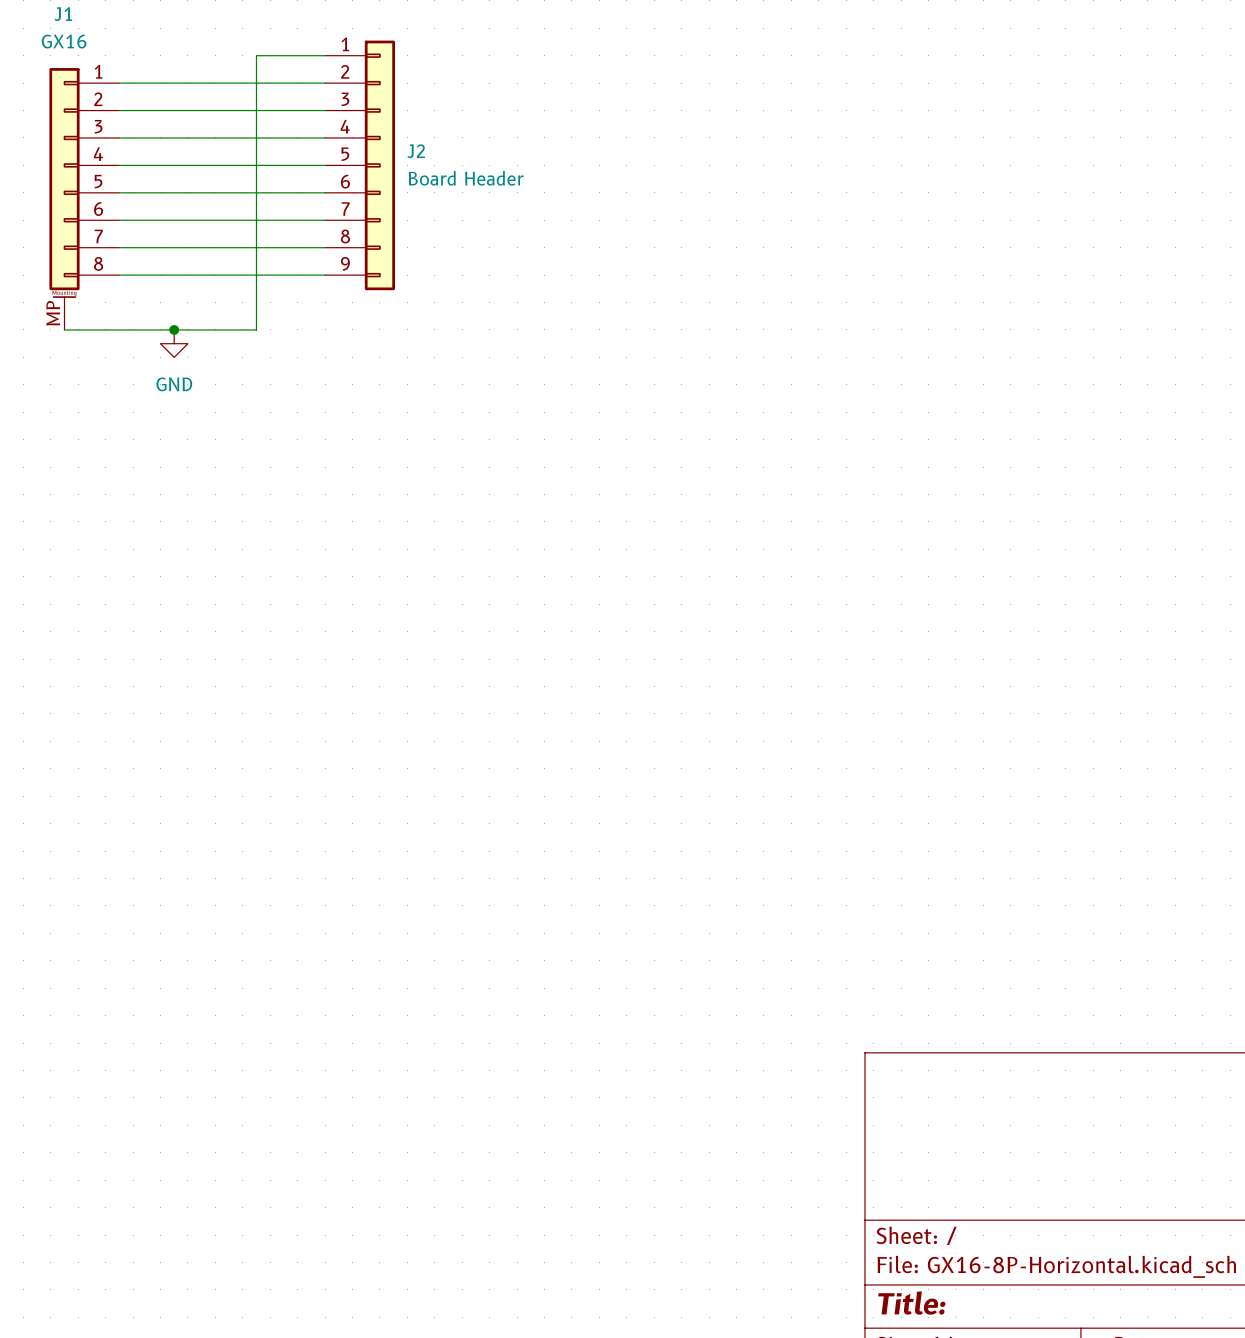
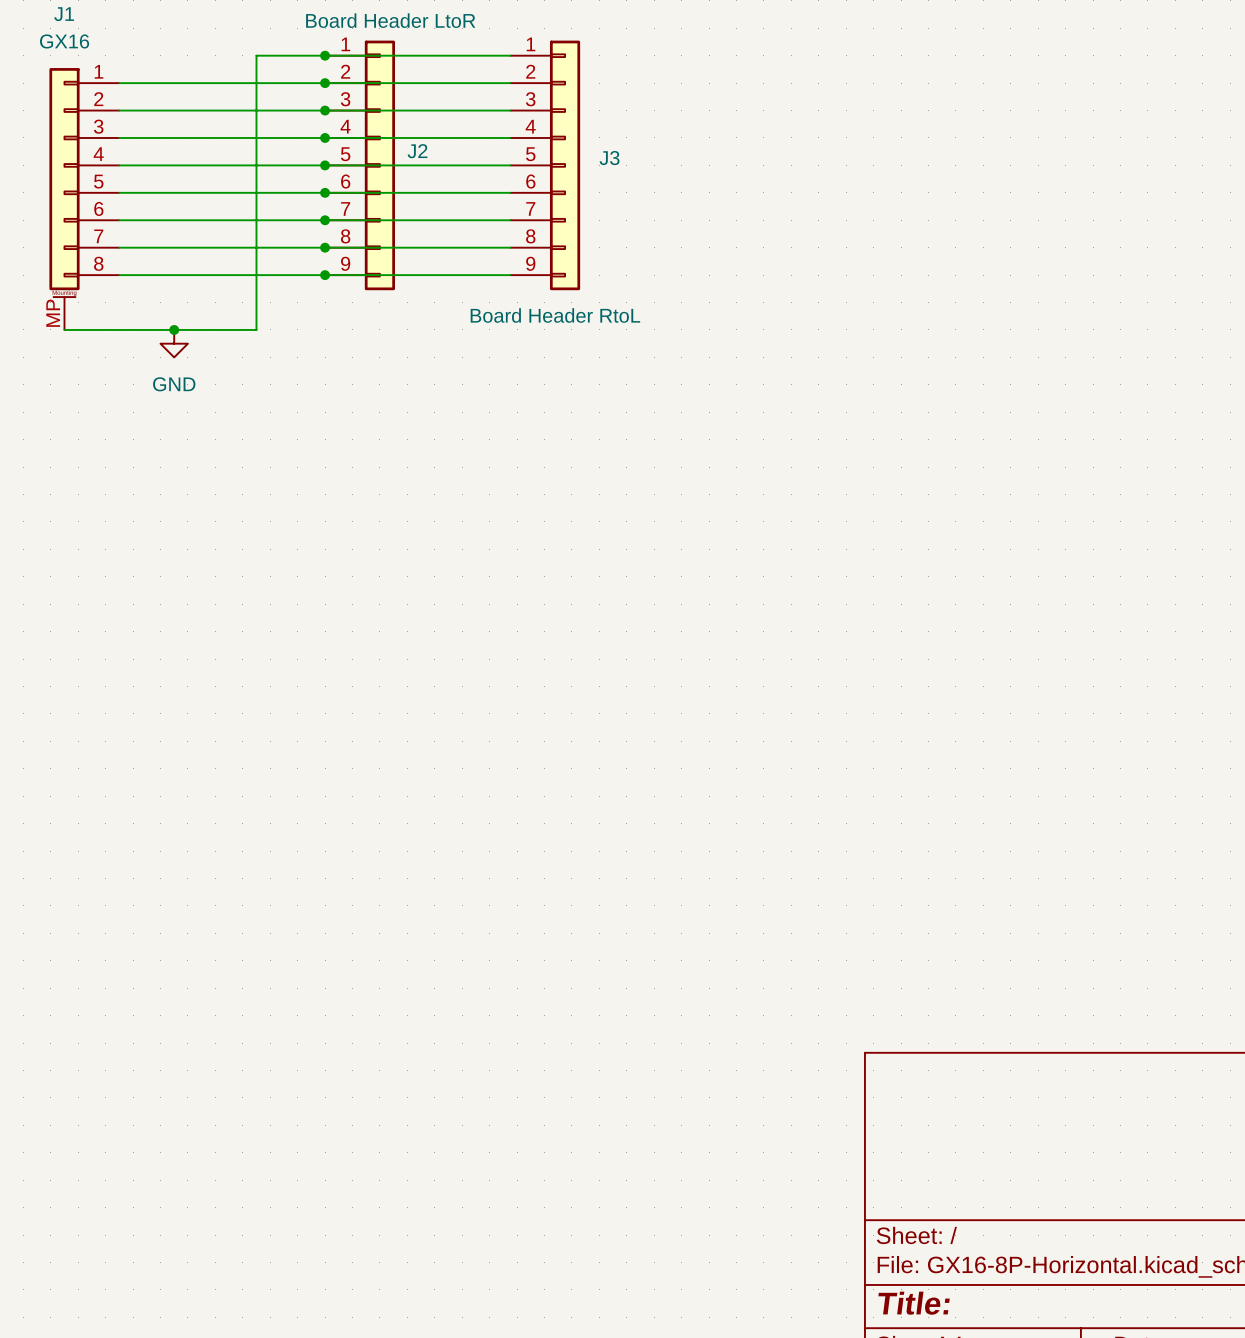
wire: none -> (325, 55) (510, 55)
junction: none -> (325, 55)
wire: none -> (325, 83) (510, 83)
junction: none -> (325, 83)
wire: none -> (325, 110) (510, 110)
junction: none -> (325, 110)
wire: none -> (325, 137) (510, 137)
junction: none -> (325, 137)
wire: none -> (325, 165) (510, 165)
junction: none -> (325, 165)
J3: none -> Board Header RtoL (545, 165)
J2 value: Board Header (466, 178) -> Board Header LtoR (390, 20)
wire: none -> (325, 192) (510, 192)
junction: none -> (325, 192)
wire: none -> (325, 220) (510, 220)
junction: none -> (325, 220)
wire: none -> (325, 247) (510, 247)
junction: none -> (325, 247)
wire: none -> (325, 275) (510, 275)
junction: none -> (325, 275)

